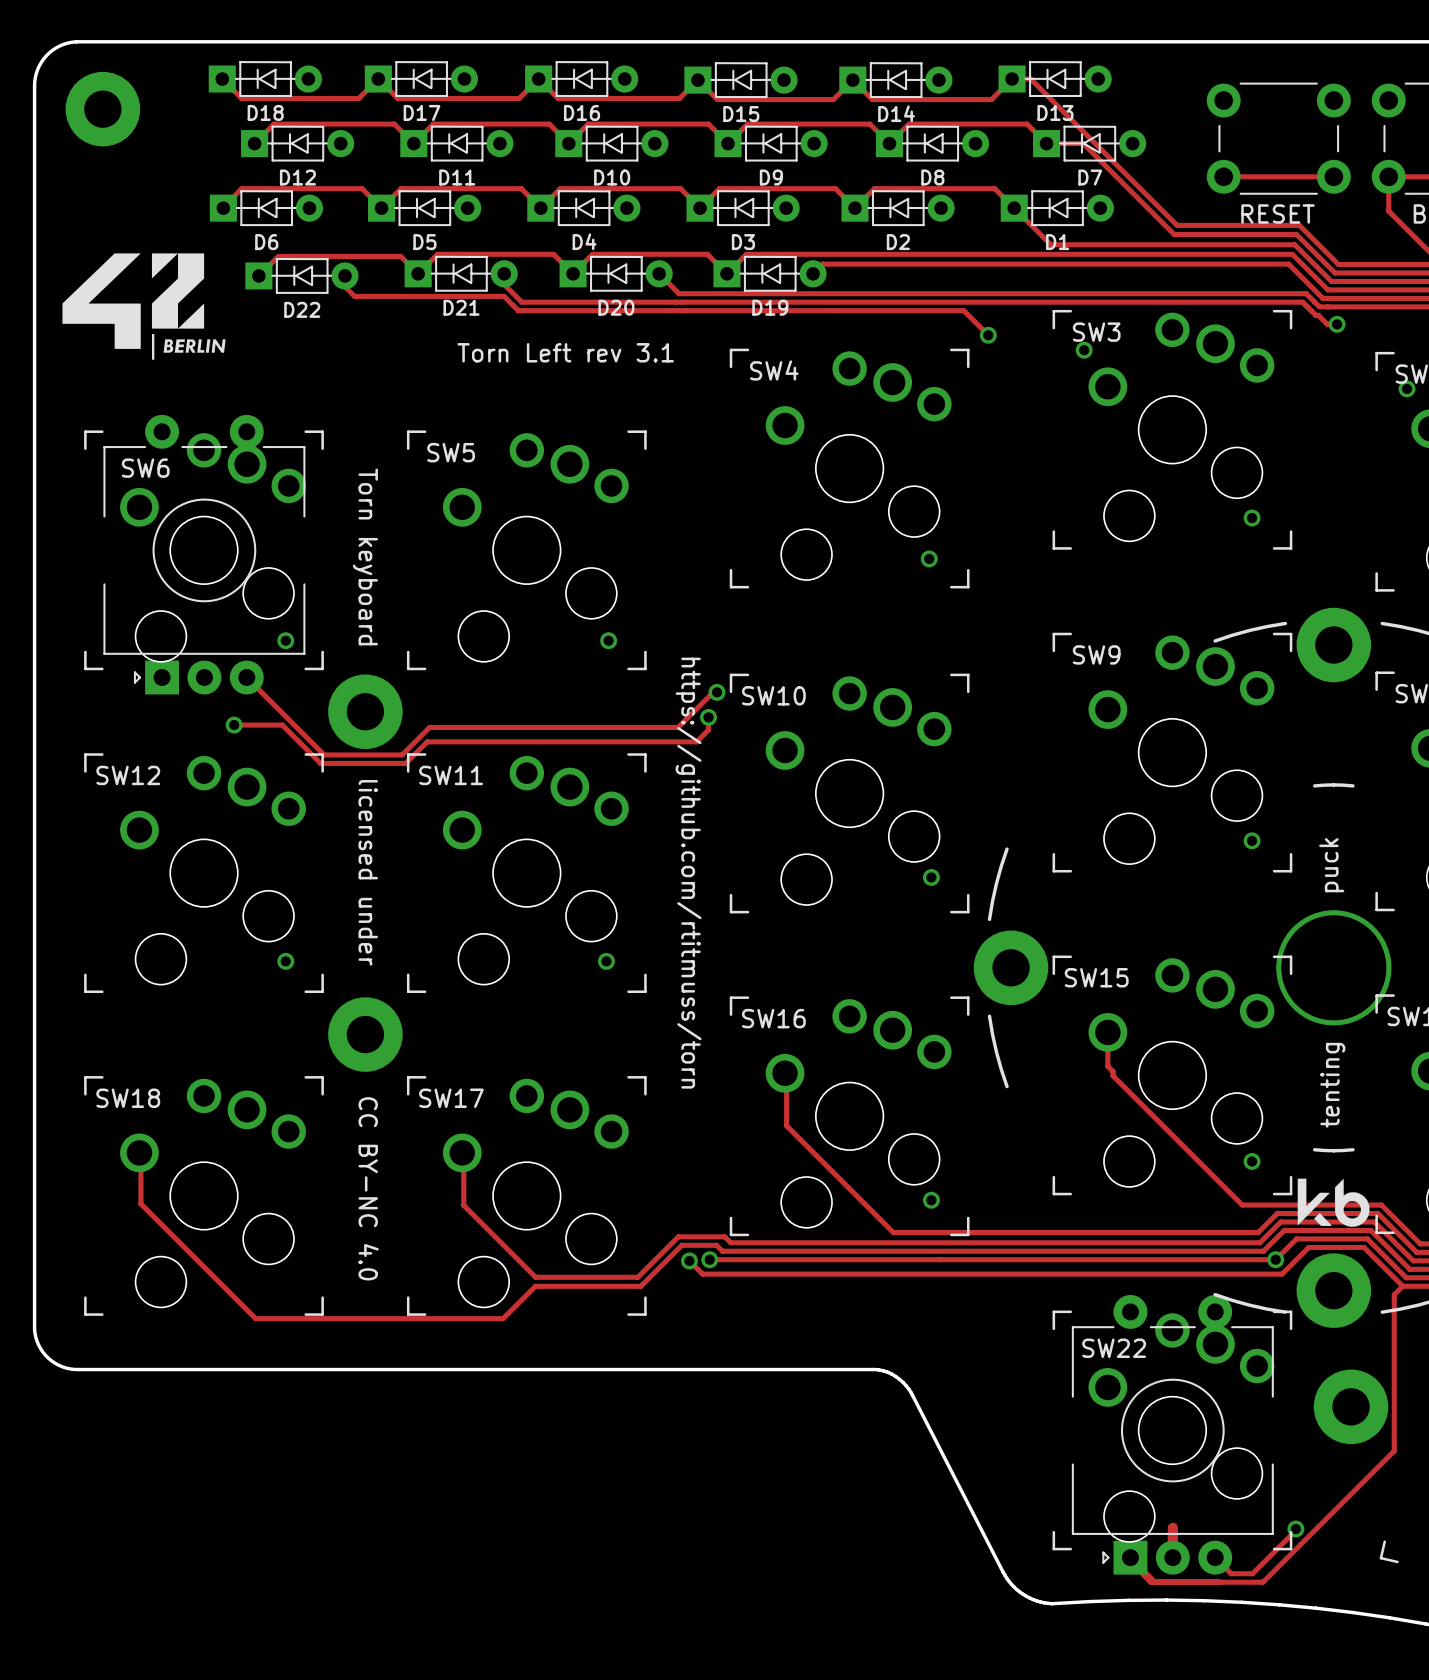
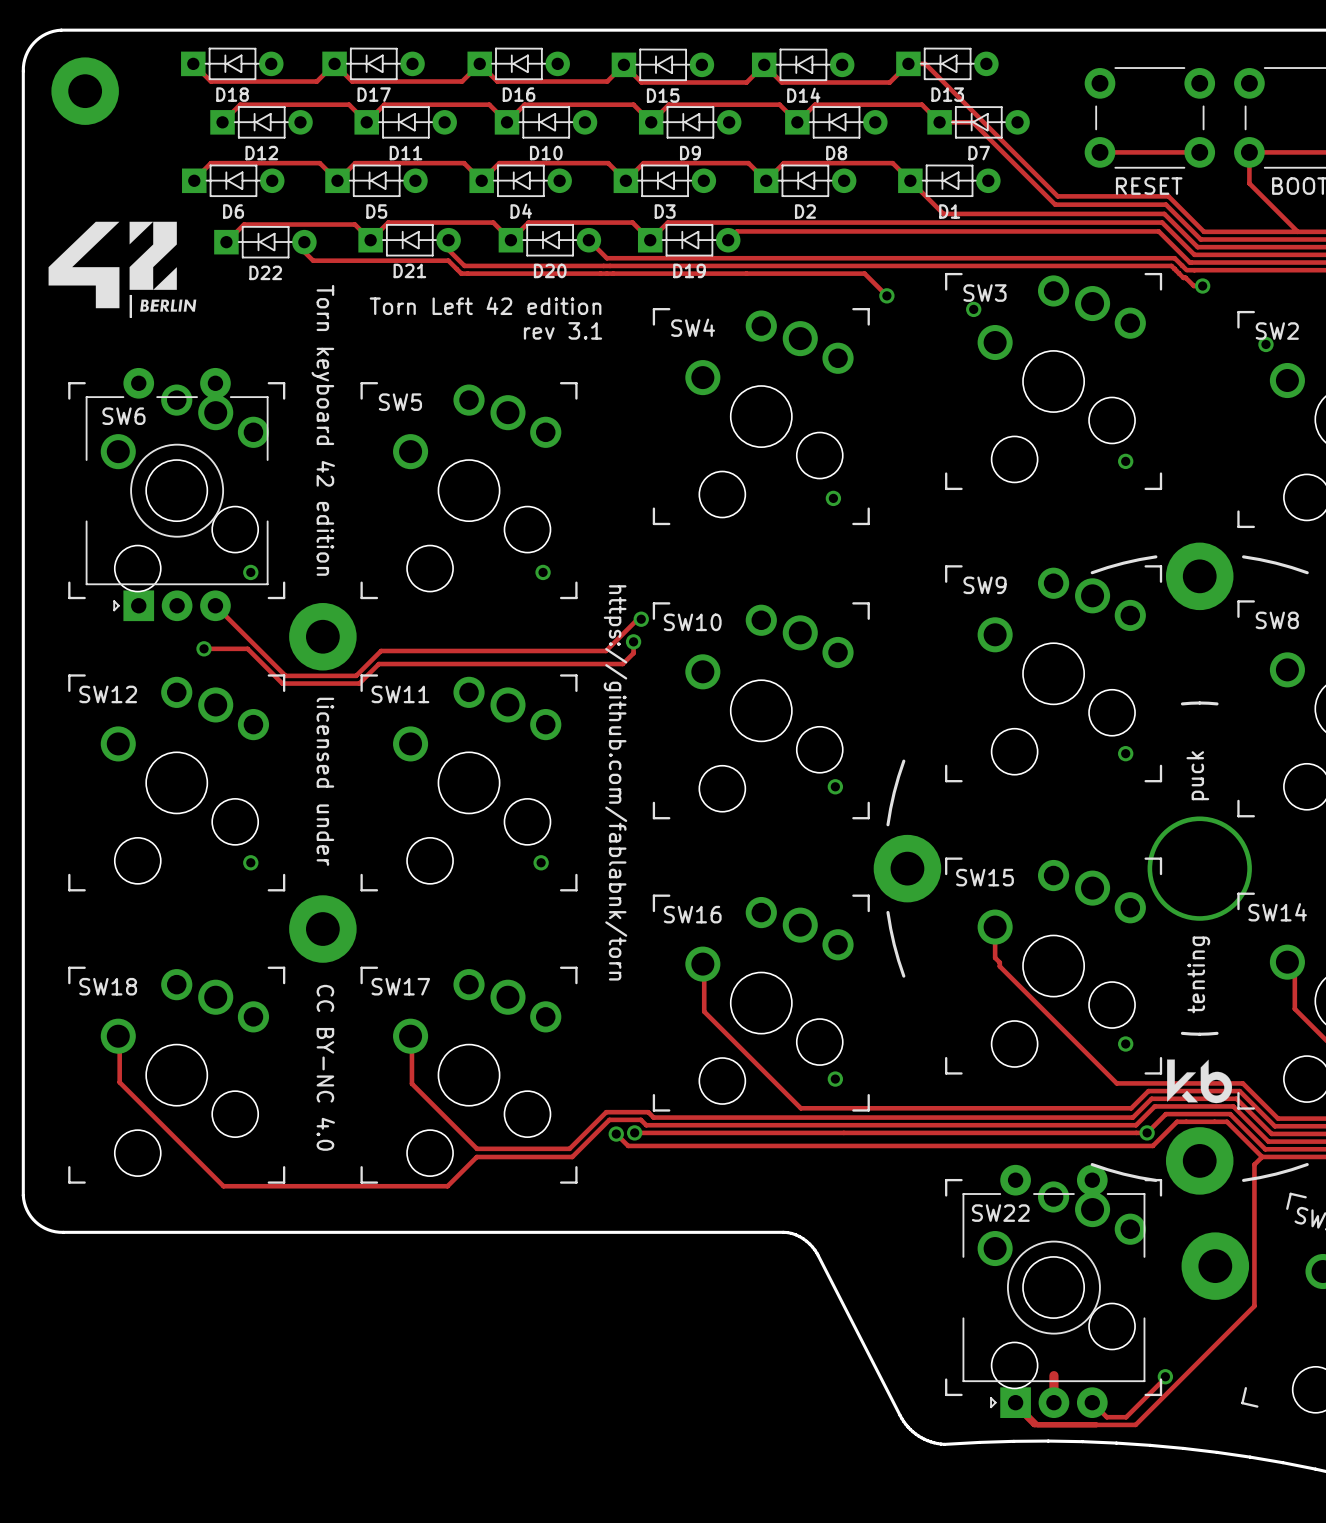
text: Torn Left rev 3.1 (565, 352) -> Torn Left 42 edition (485, 305)
text: none -> rev 3.1 (562, 330)
text: https://github.com/rtitmuss/torn (688, 873) -> https://github.com/fablabnk/torn (615, 782)
text: Torn keyboard licensed under CC BY-NC 4.0 (365, 874) -> Torn keyboard 42 edition licensed under CC BY-NC 4.0 (323, 717)

